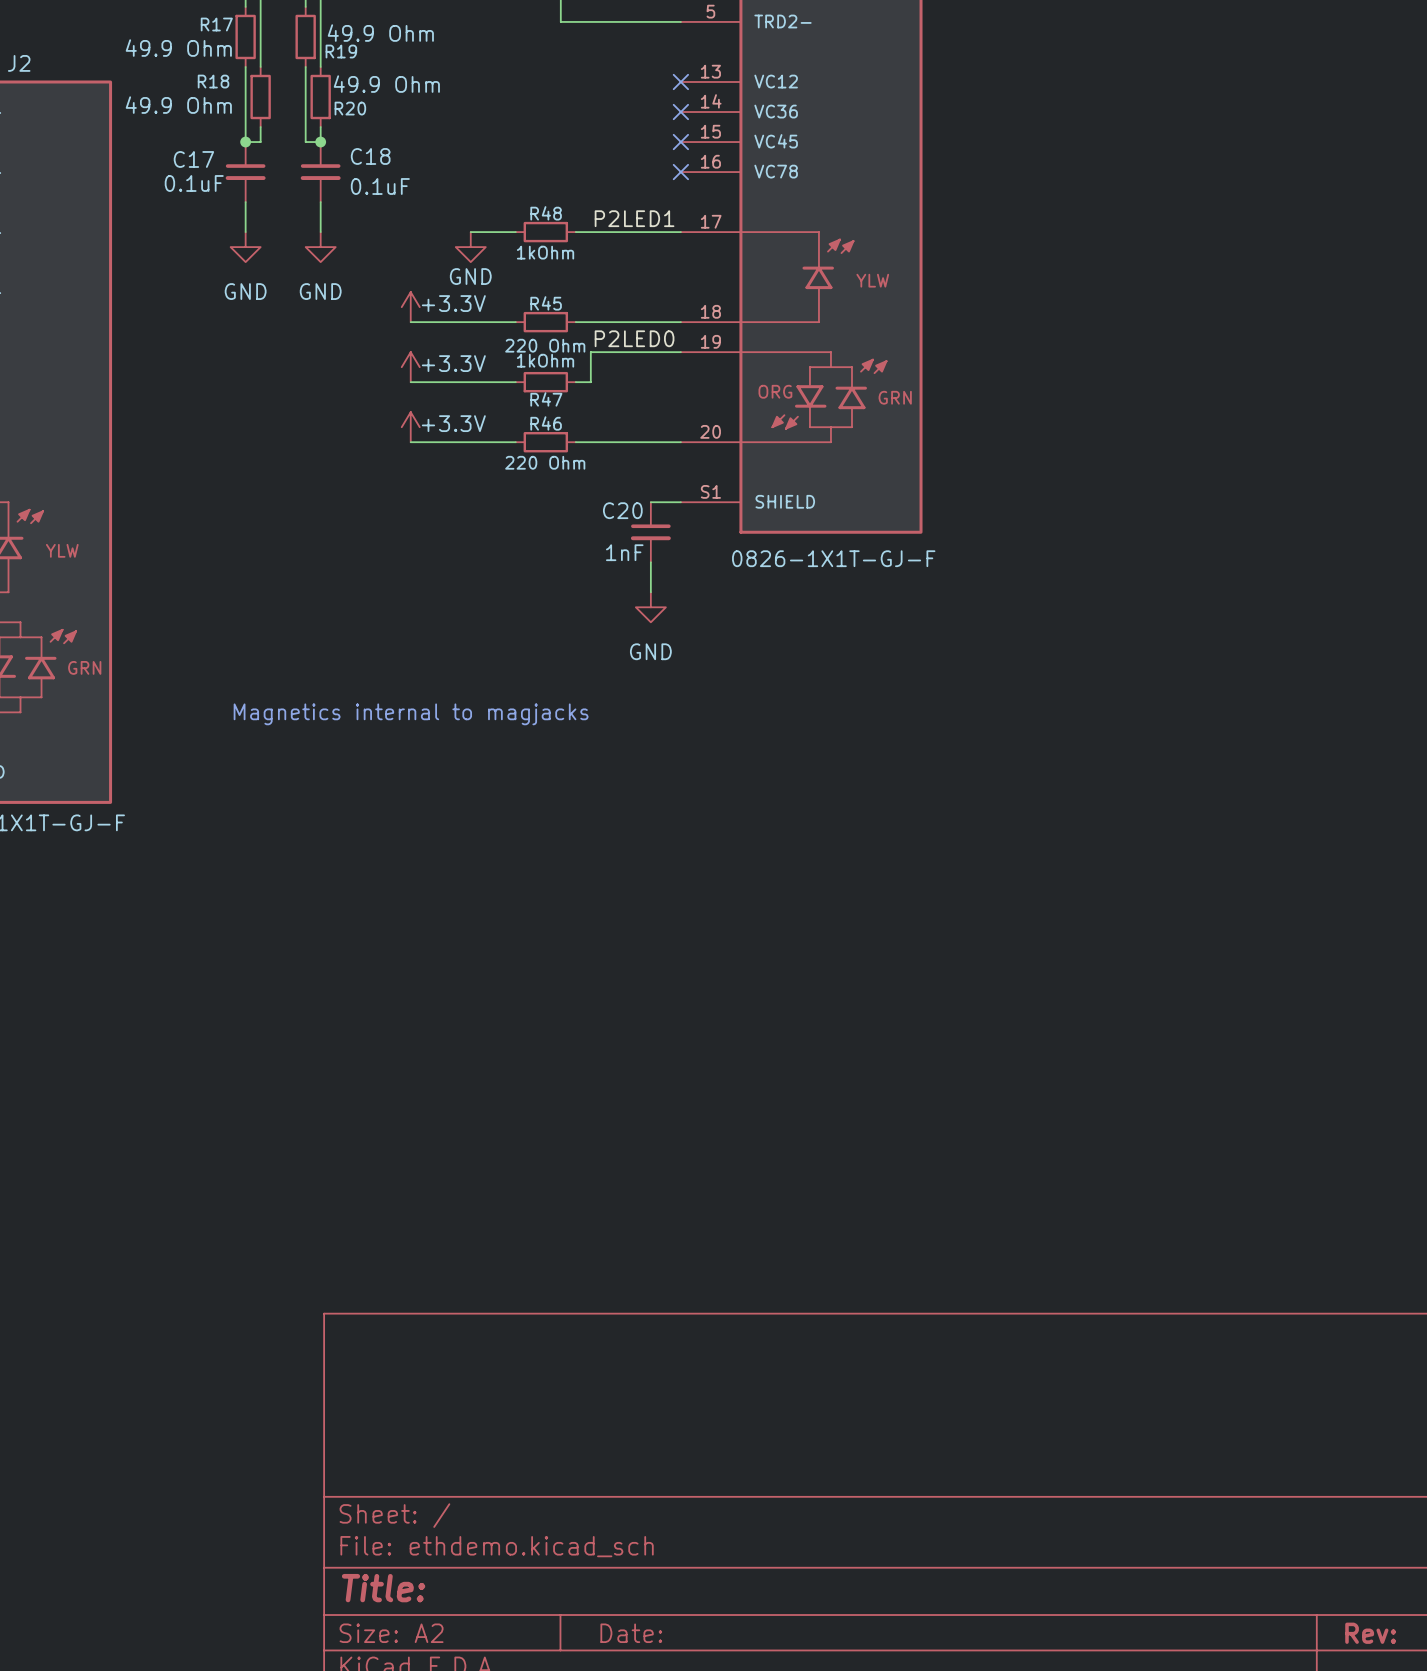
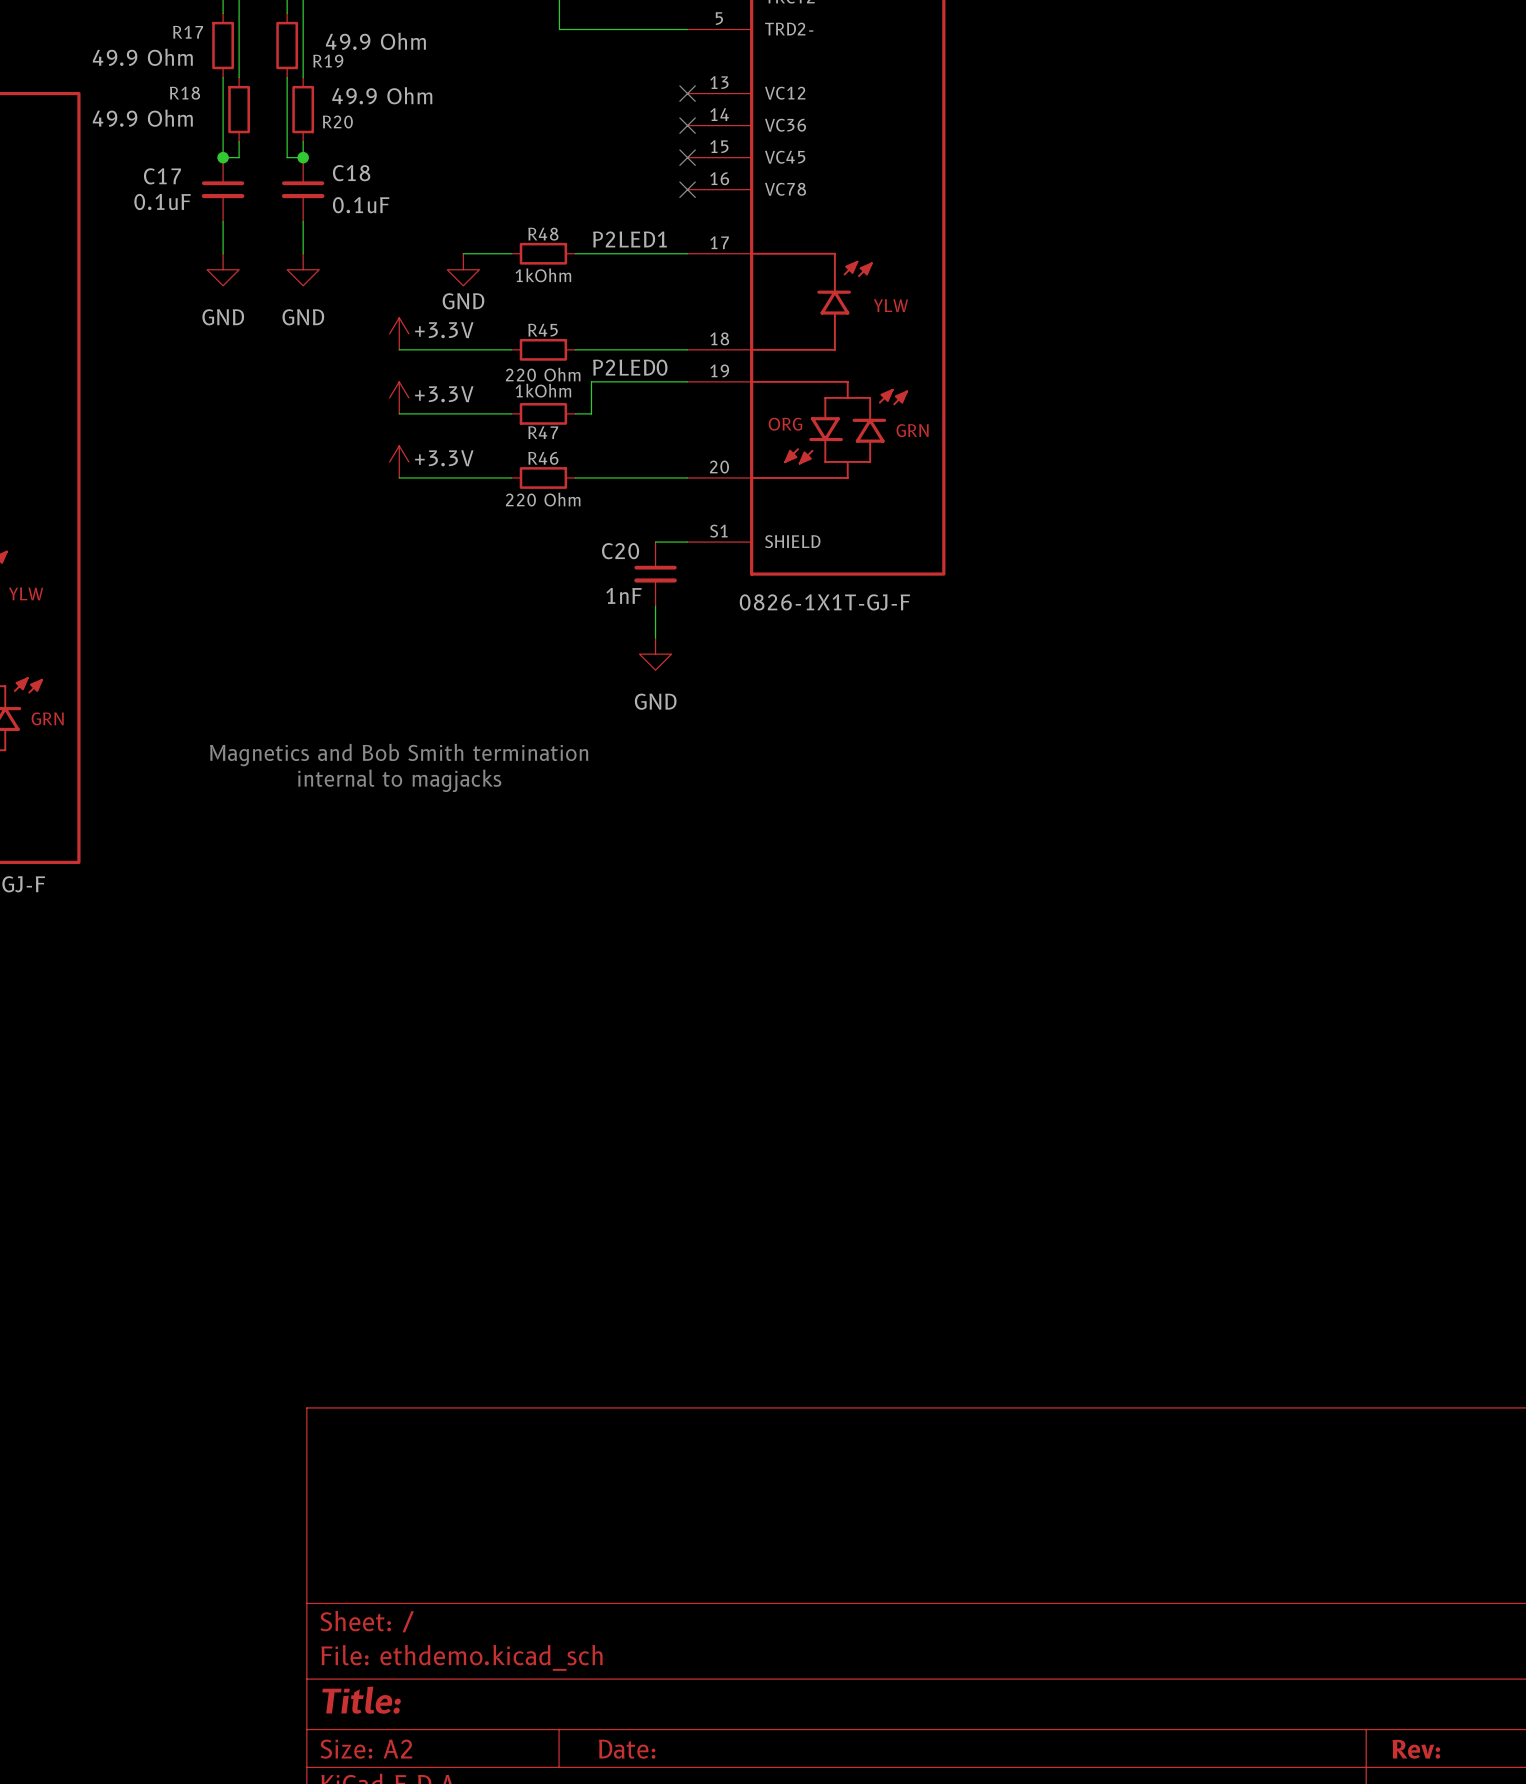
text: none -> Magnetics and Bob Smith termination (399, 755)
text: Magnetics internal to magjacks (411, 714) -> internal to magjacks (399, 780)

